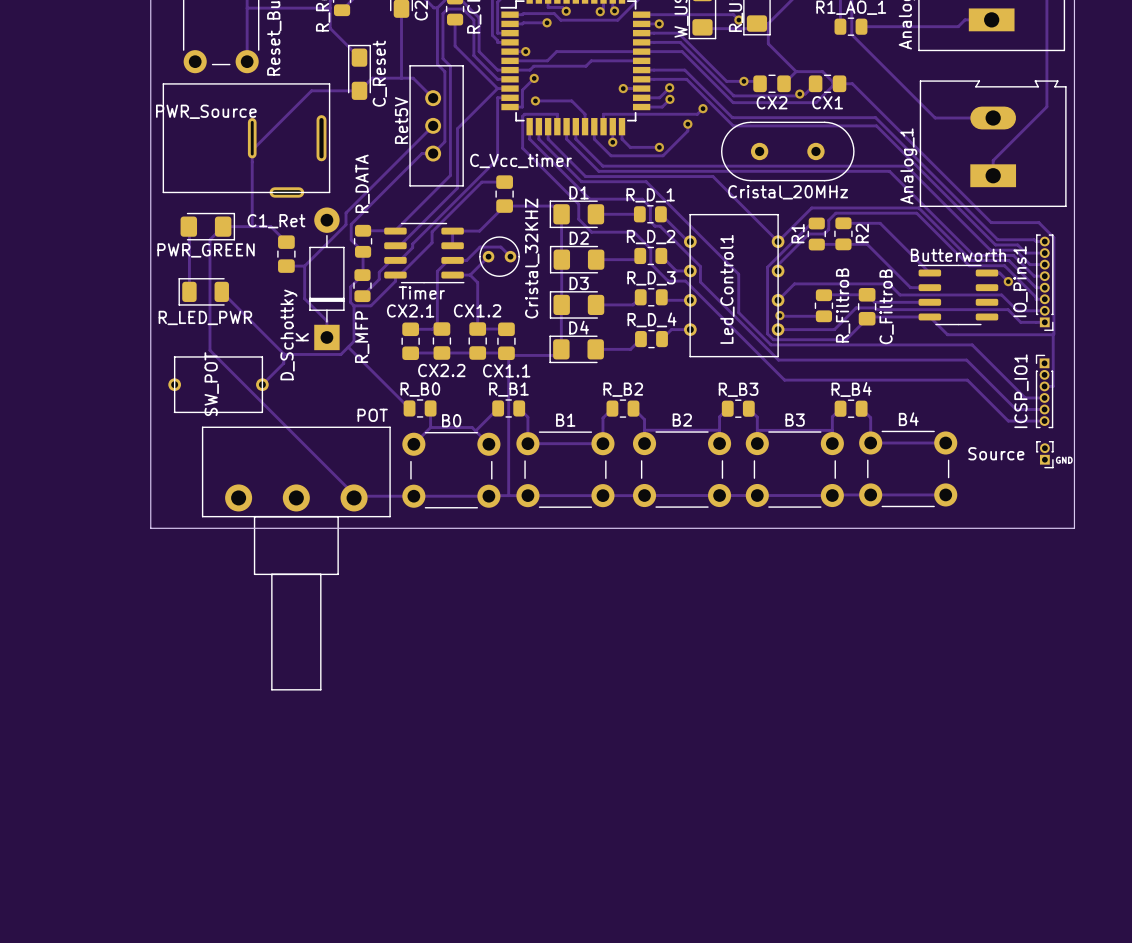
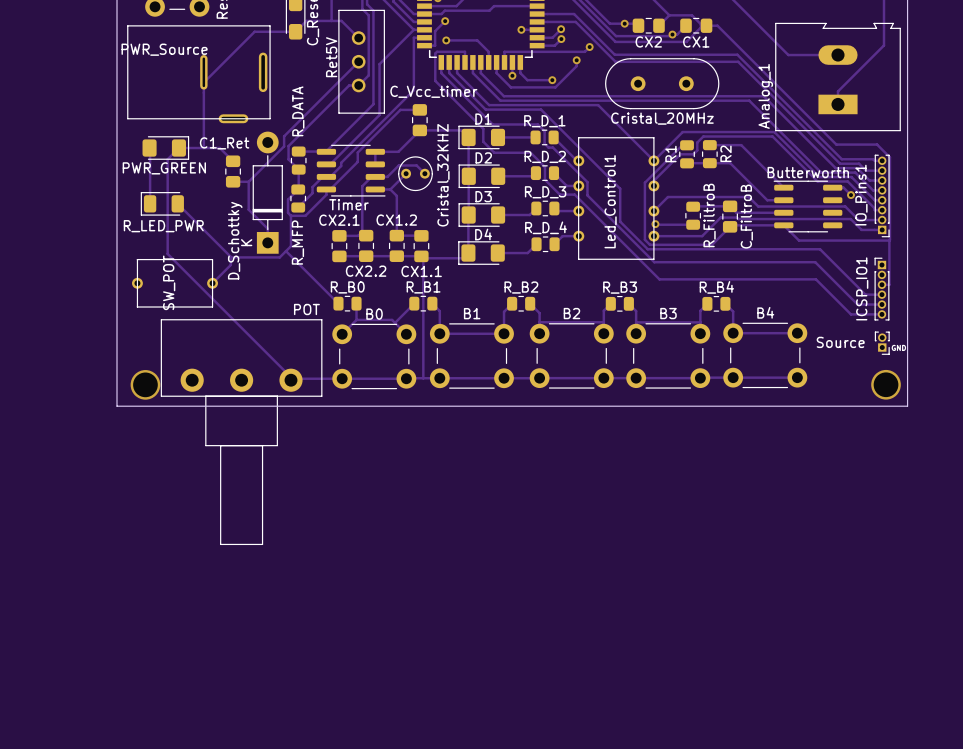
via: none -> (145, 384)
via: none -> (886, 384)

